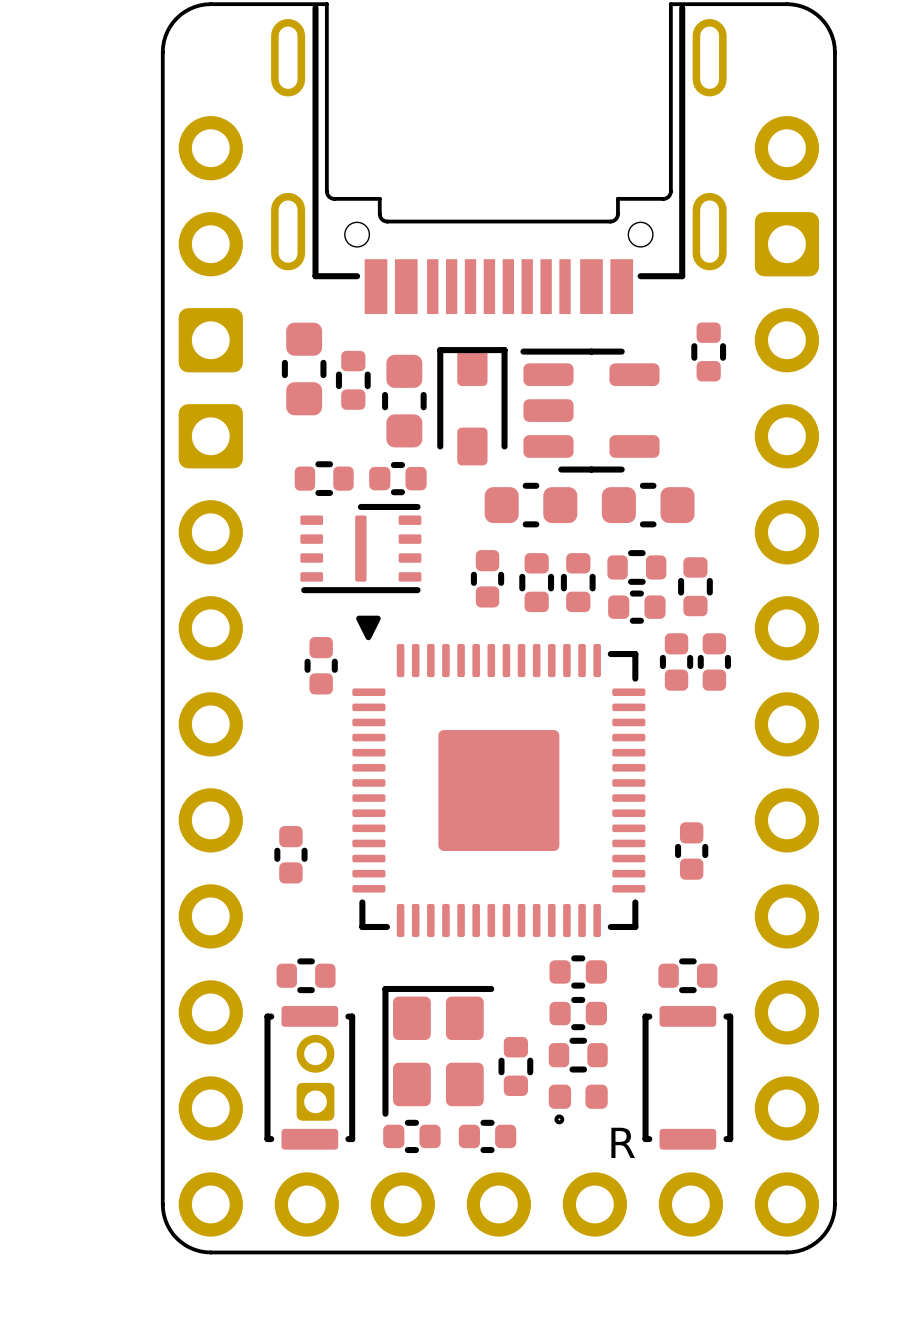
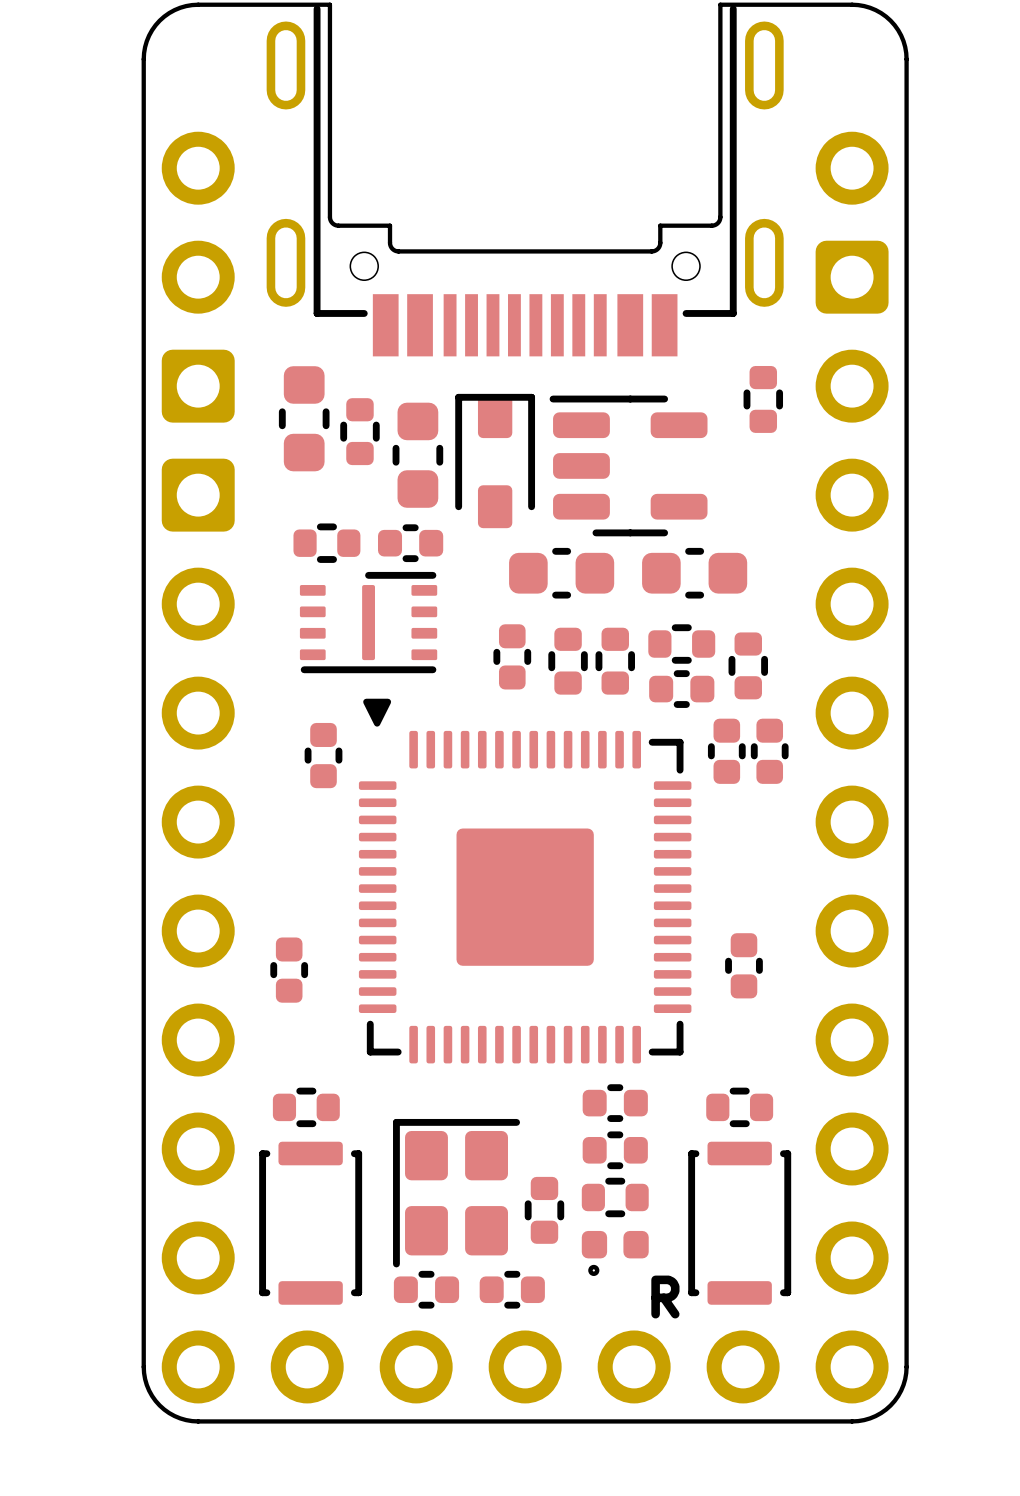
part: (315, 1077) -> none

